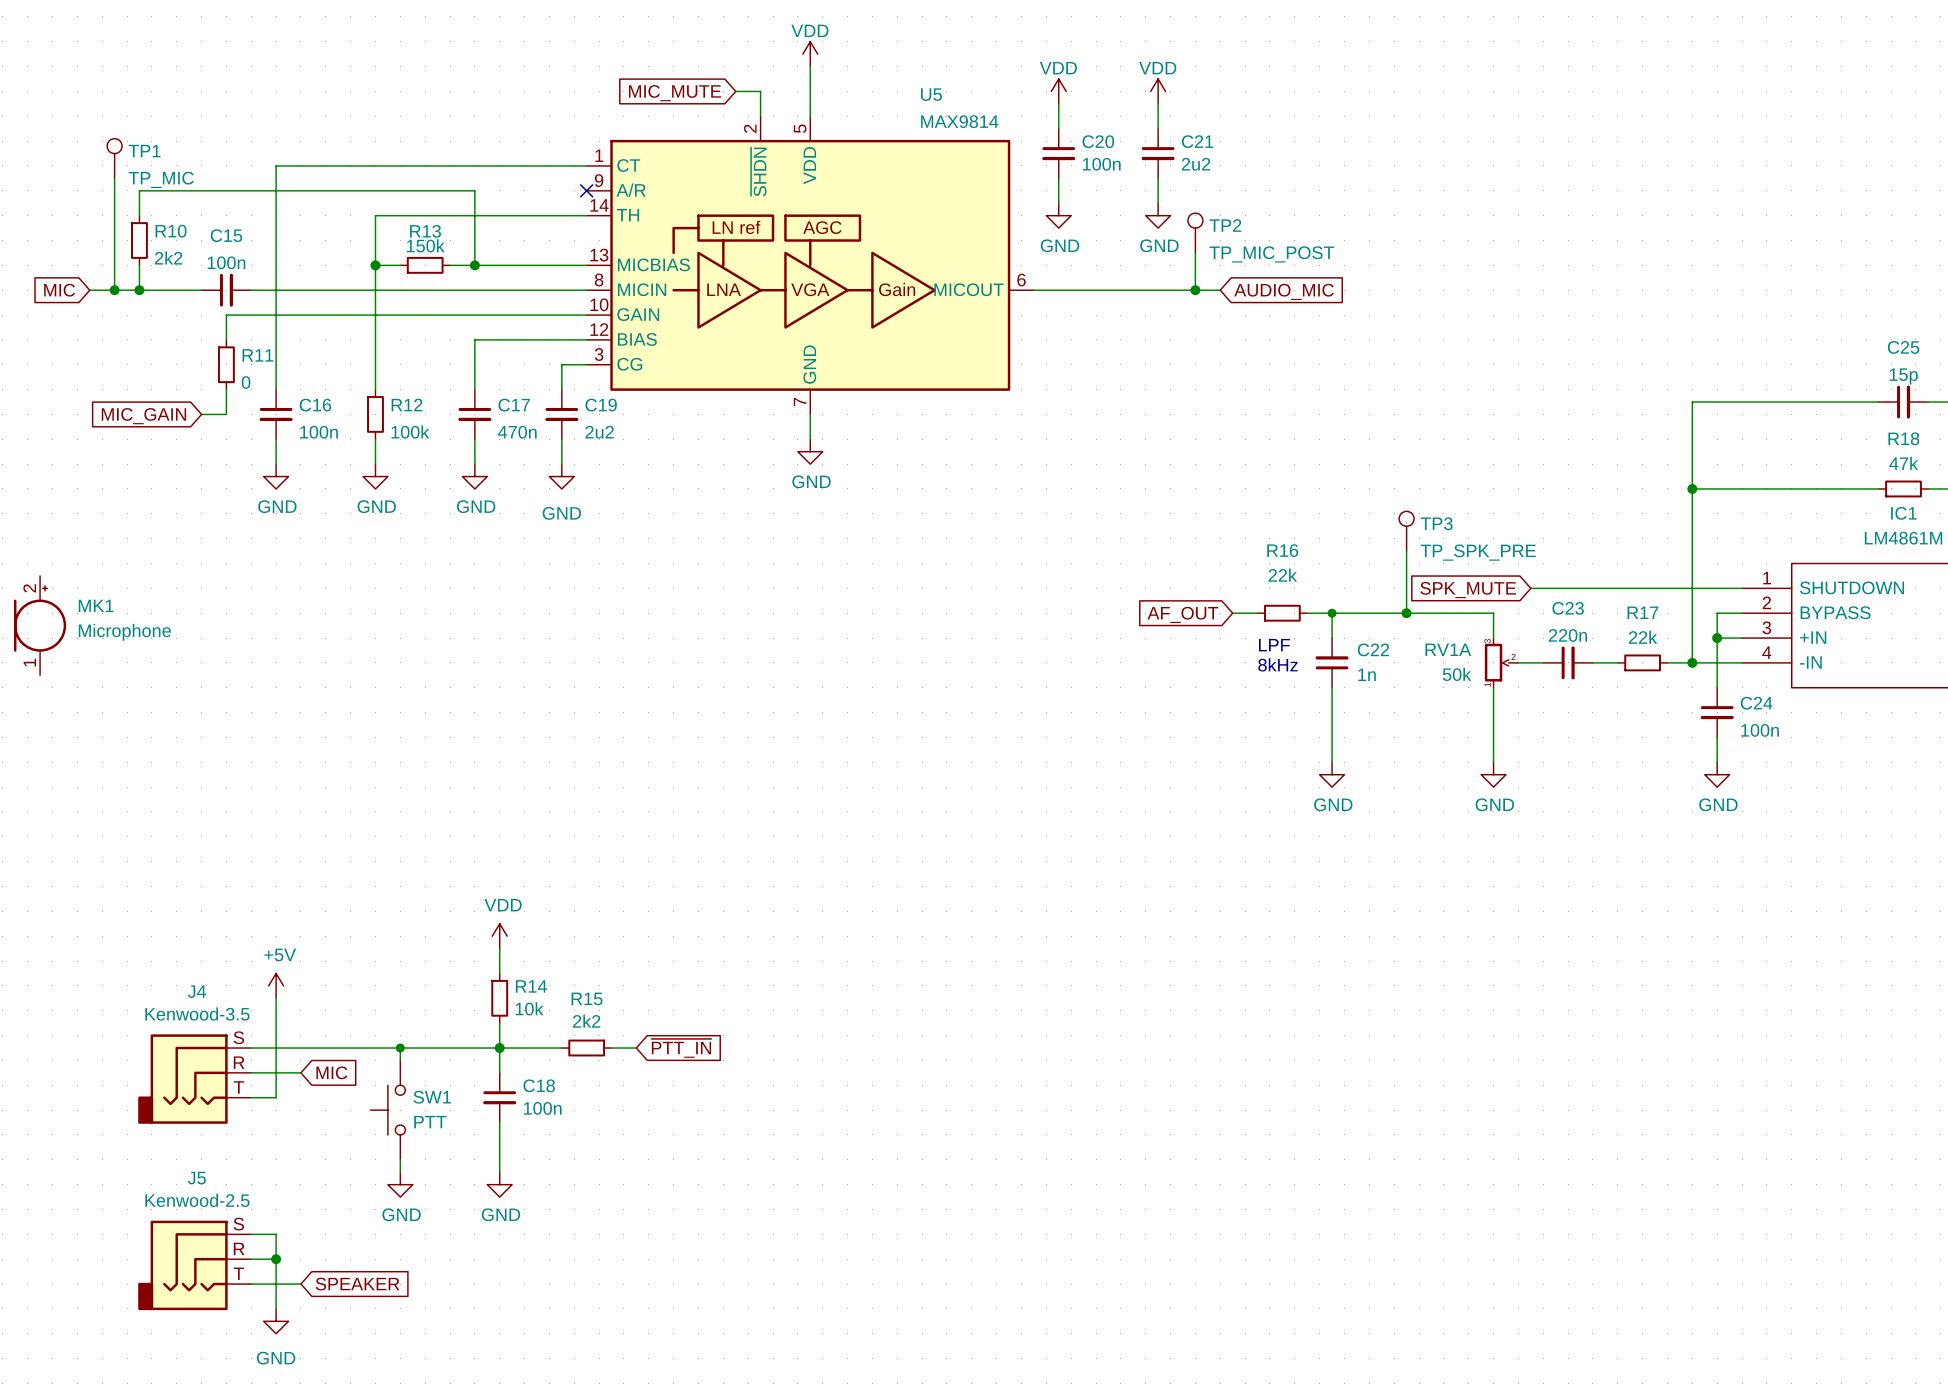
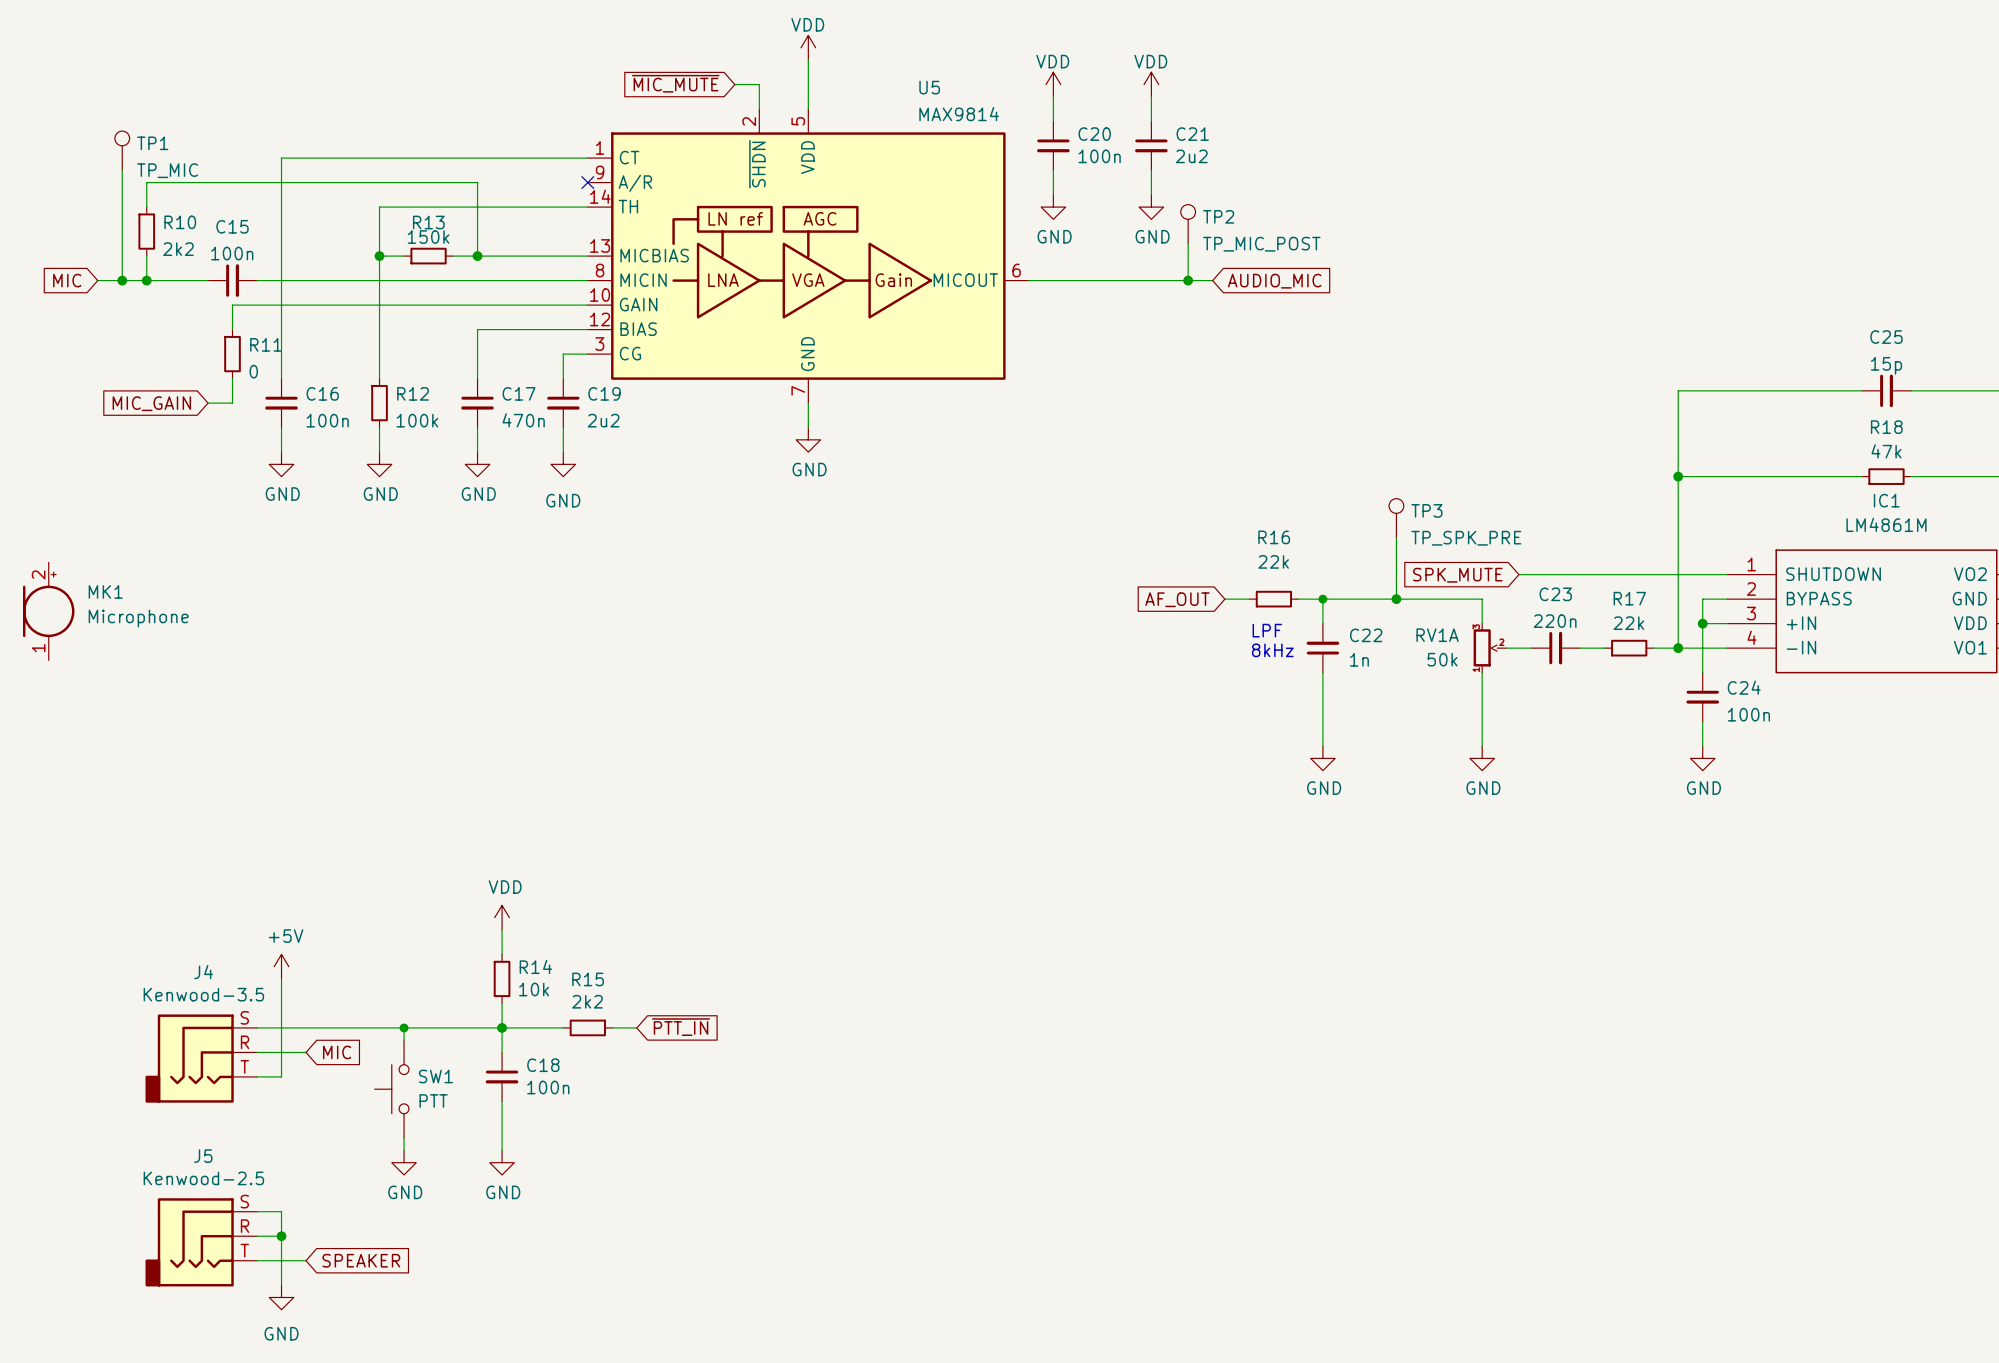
global label: MIC_MUTE (674, 93) -> ~{MIC_MUTE} (675, 83)

